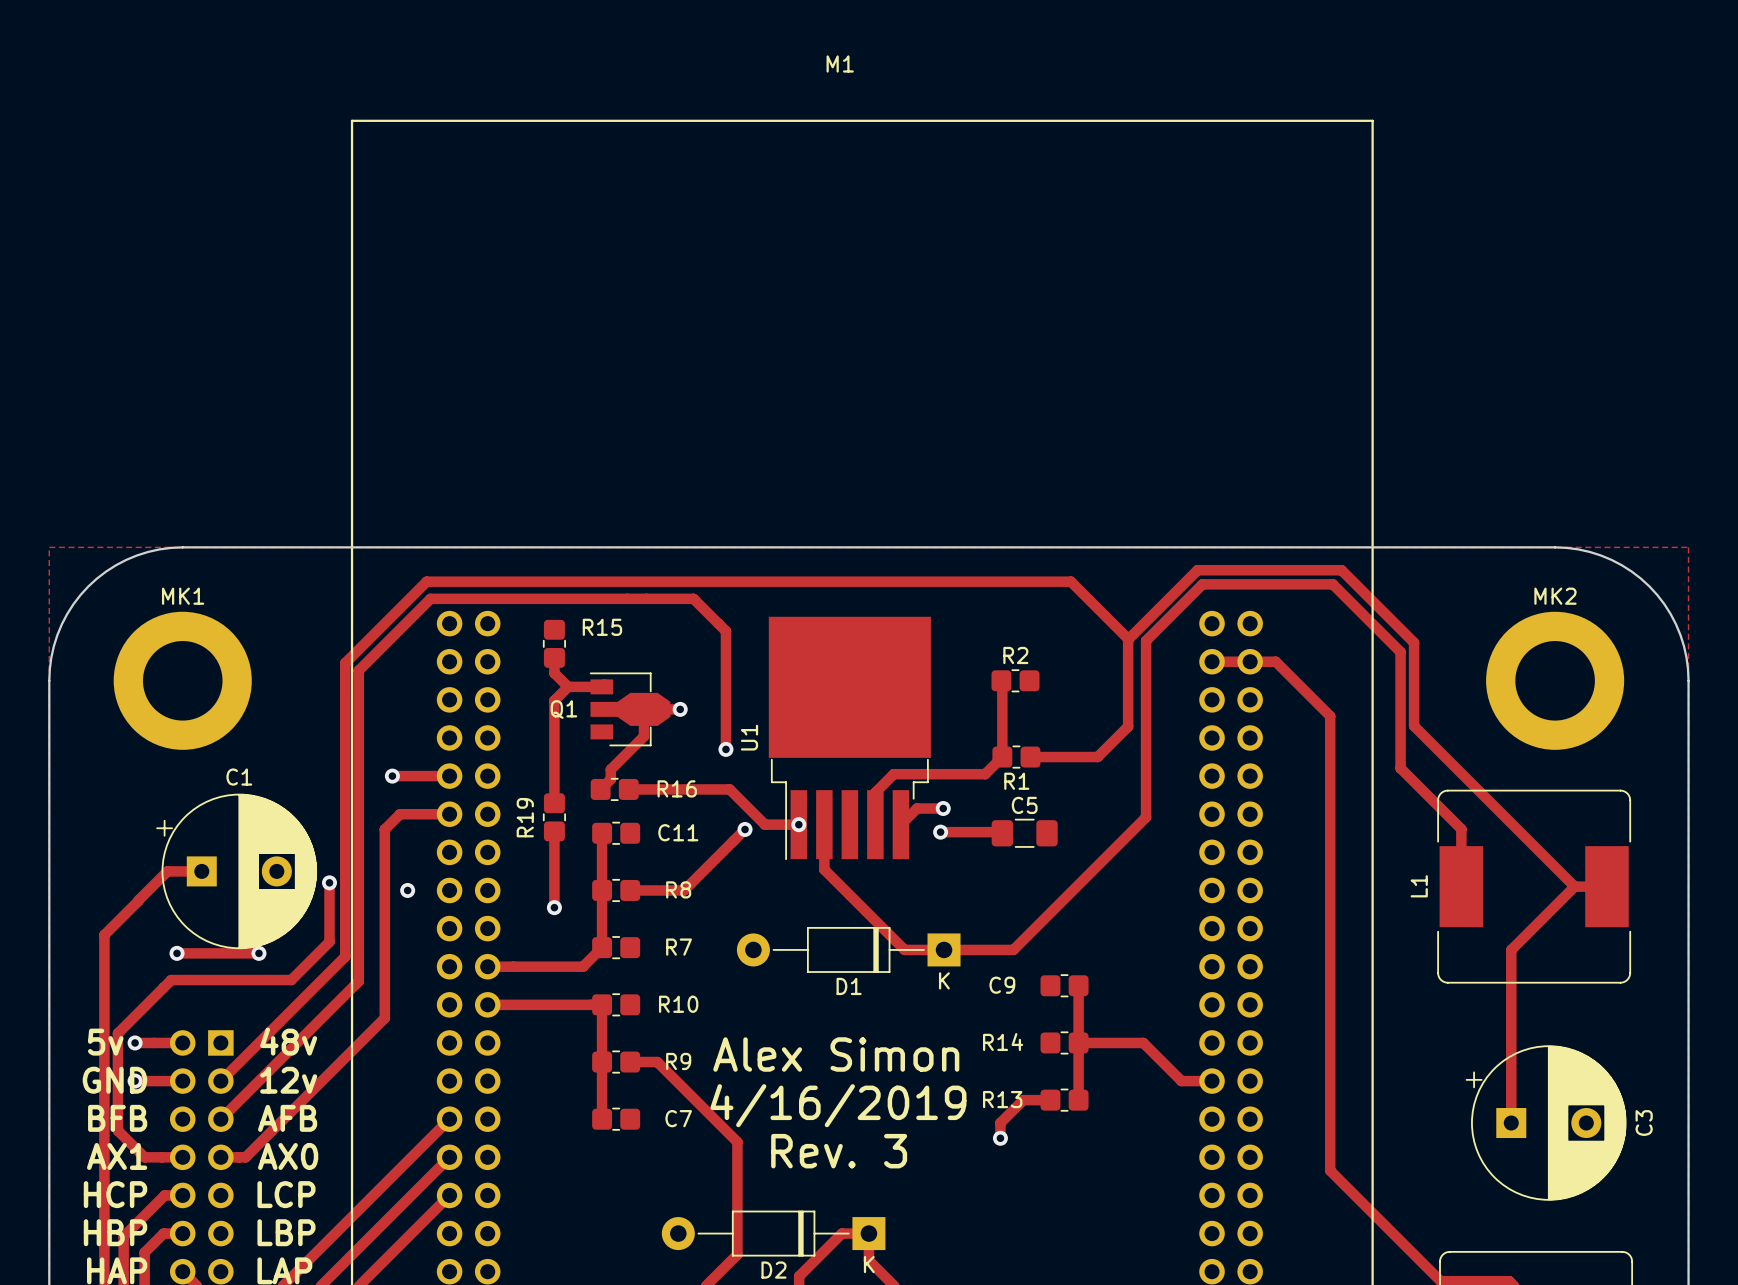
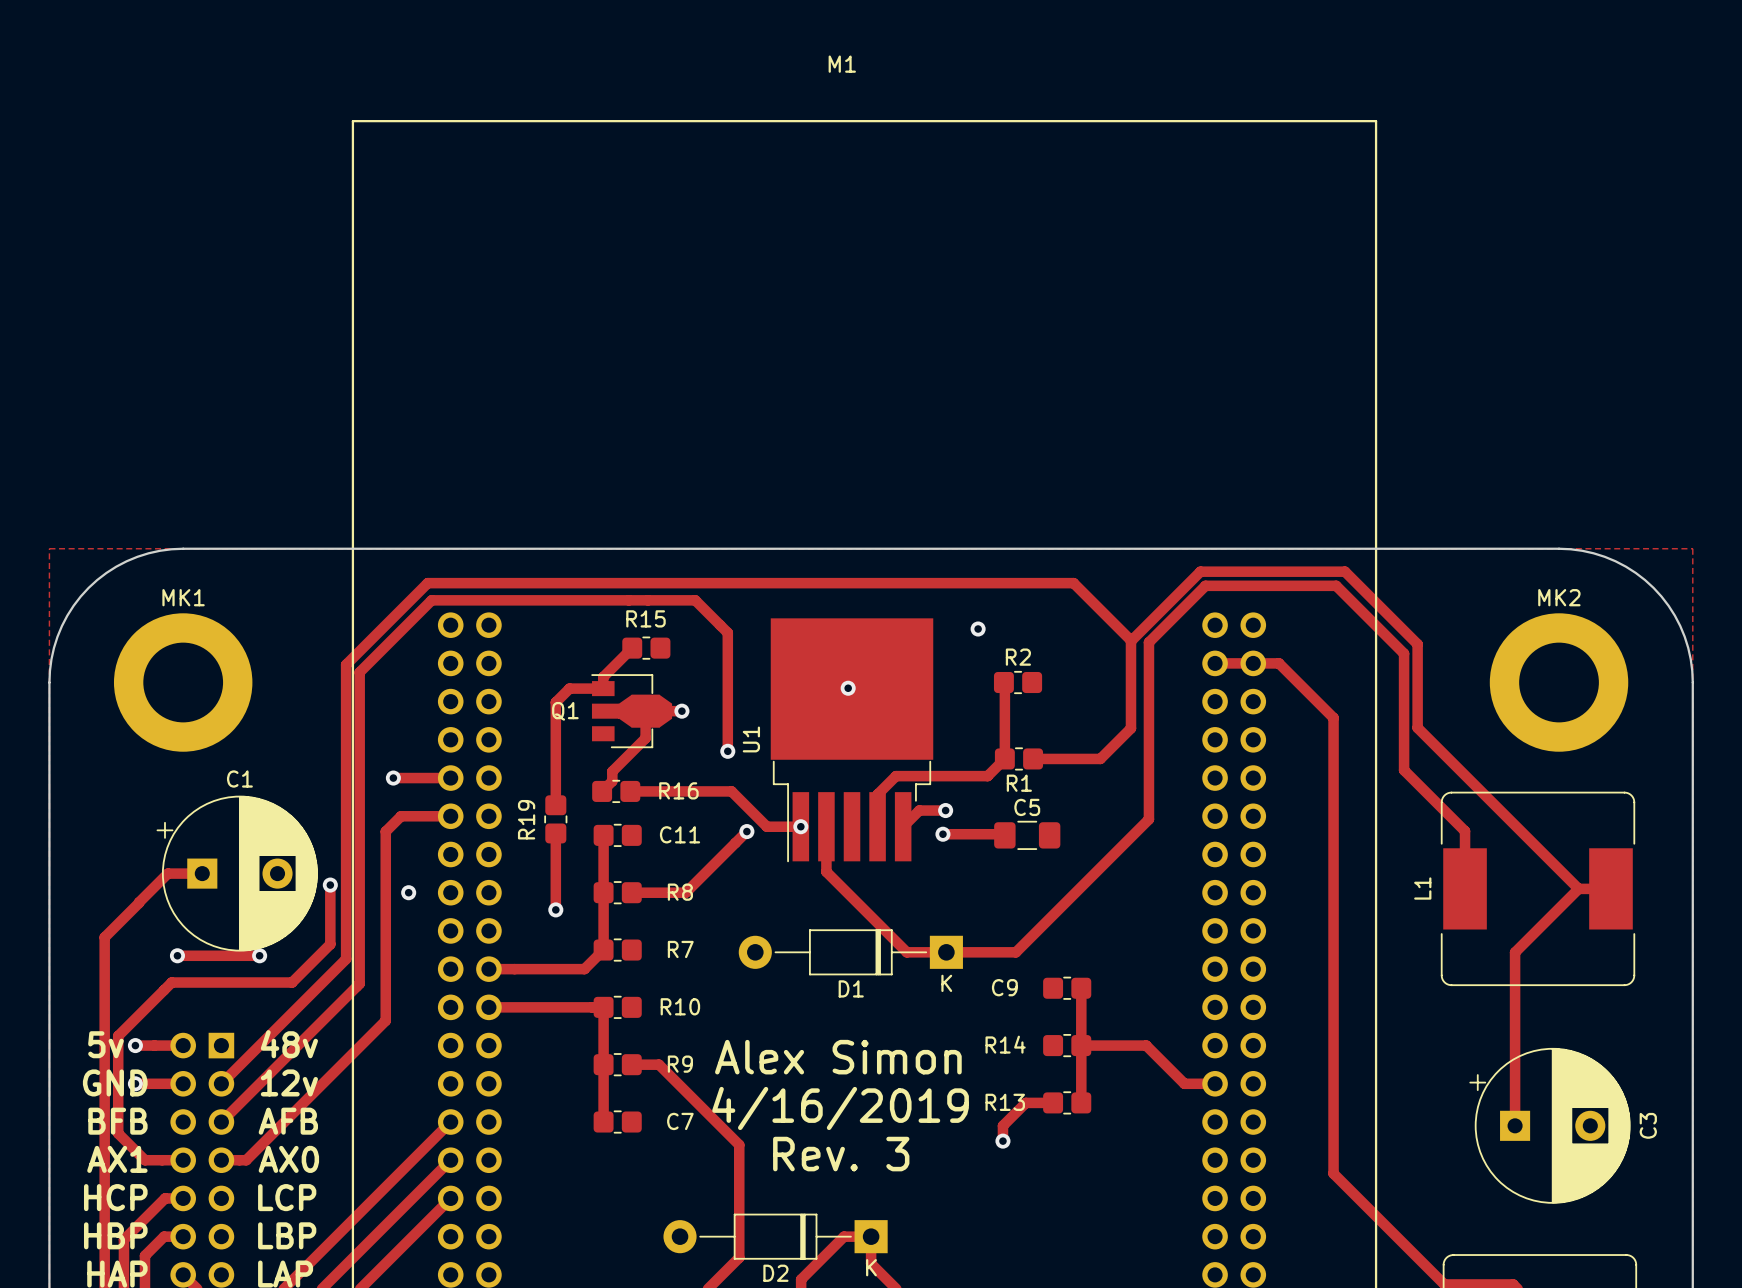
R15 name position: R15 (602, 627) -> R15 (645, 618)
via: none -> (978, 629)
R15 rotation: 0° (554, 643) -> 90° clockwise (646, 648)
R15 position: (554, 643) -> (646, 648)
track: none -> (632, 648) (603, 677) (603, 688)
track: (554, 657) (554, 673) (568, 686) -> none
via: none -> (848, 688)

